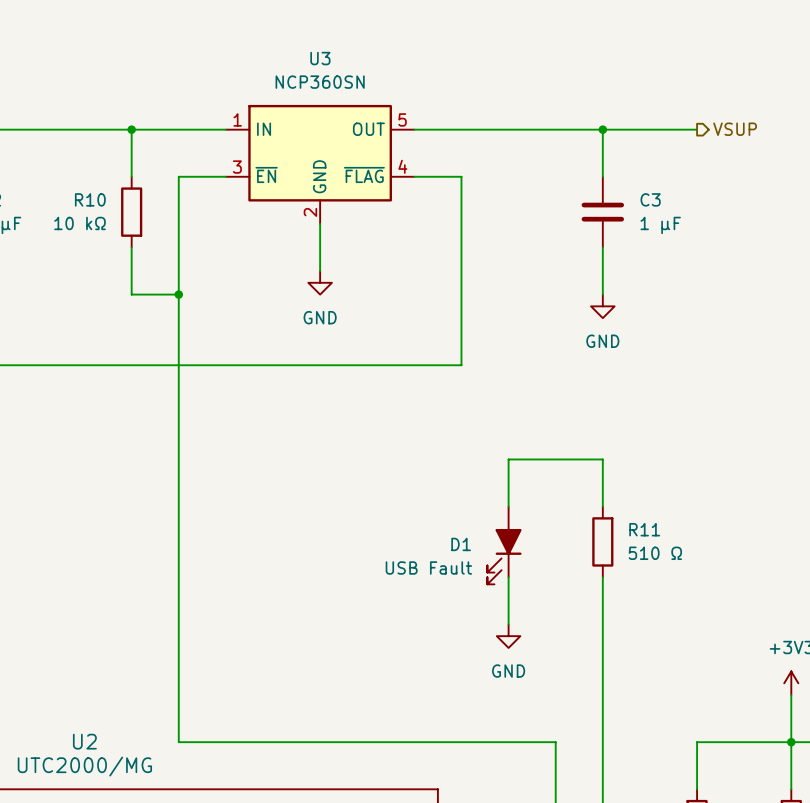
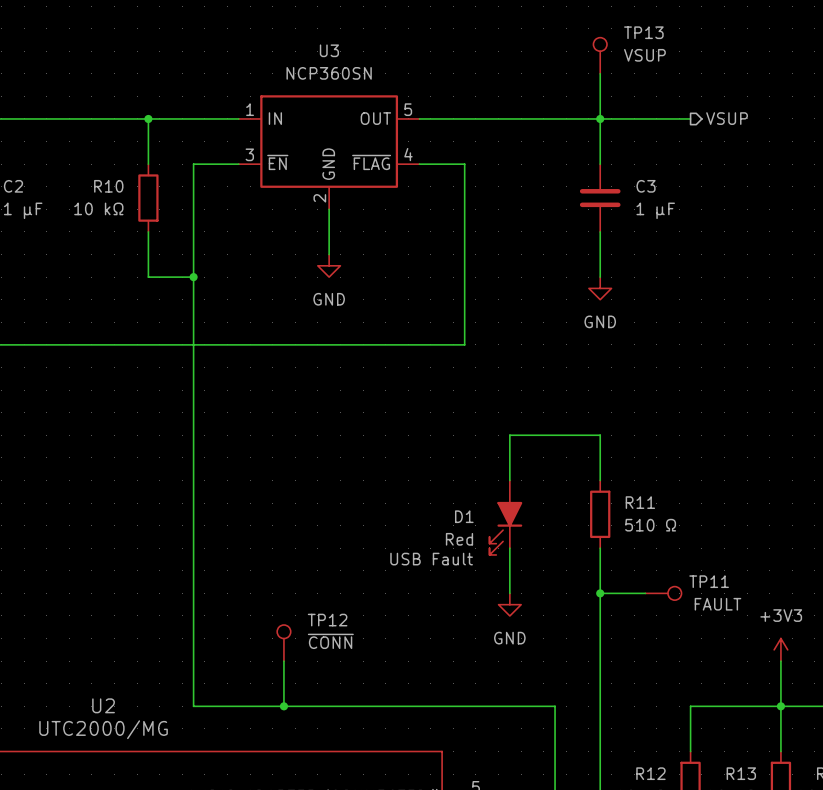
TP13: none -> VSUP (600, 55)
wire: none -> (600, 73) (600, 118)
D1 value: USB Fault (428, 568) -> Red (459, 539)
D1 text: none -> USB Fault (431, 559)
wire: none -> (600, 593) (645, 593)
junction: none -> (600, 593)
TP11: none -> FAULT (663, 593)
TP12: none -> ~{CONN} (283, 643)
wire: none -> (283, 661) (283, 706)
junction: none -> (283, 706)

